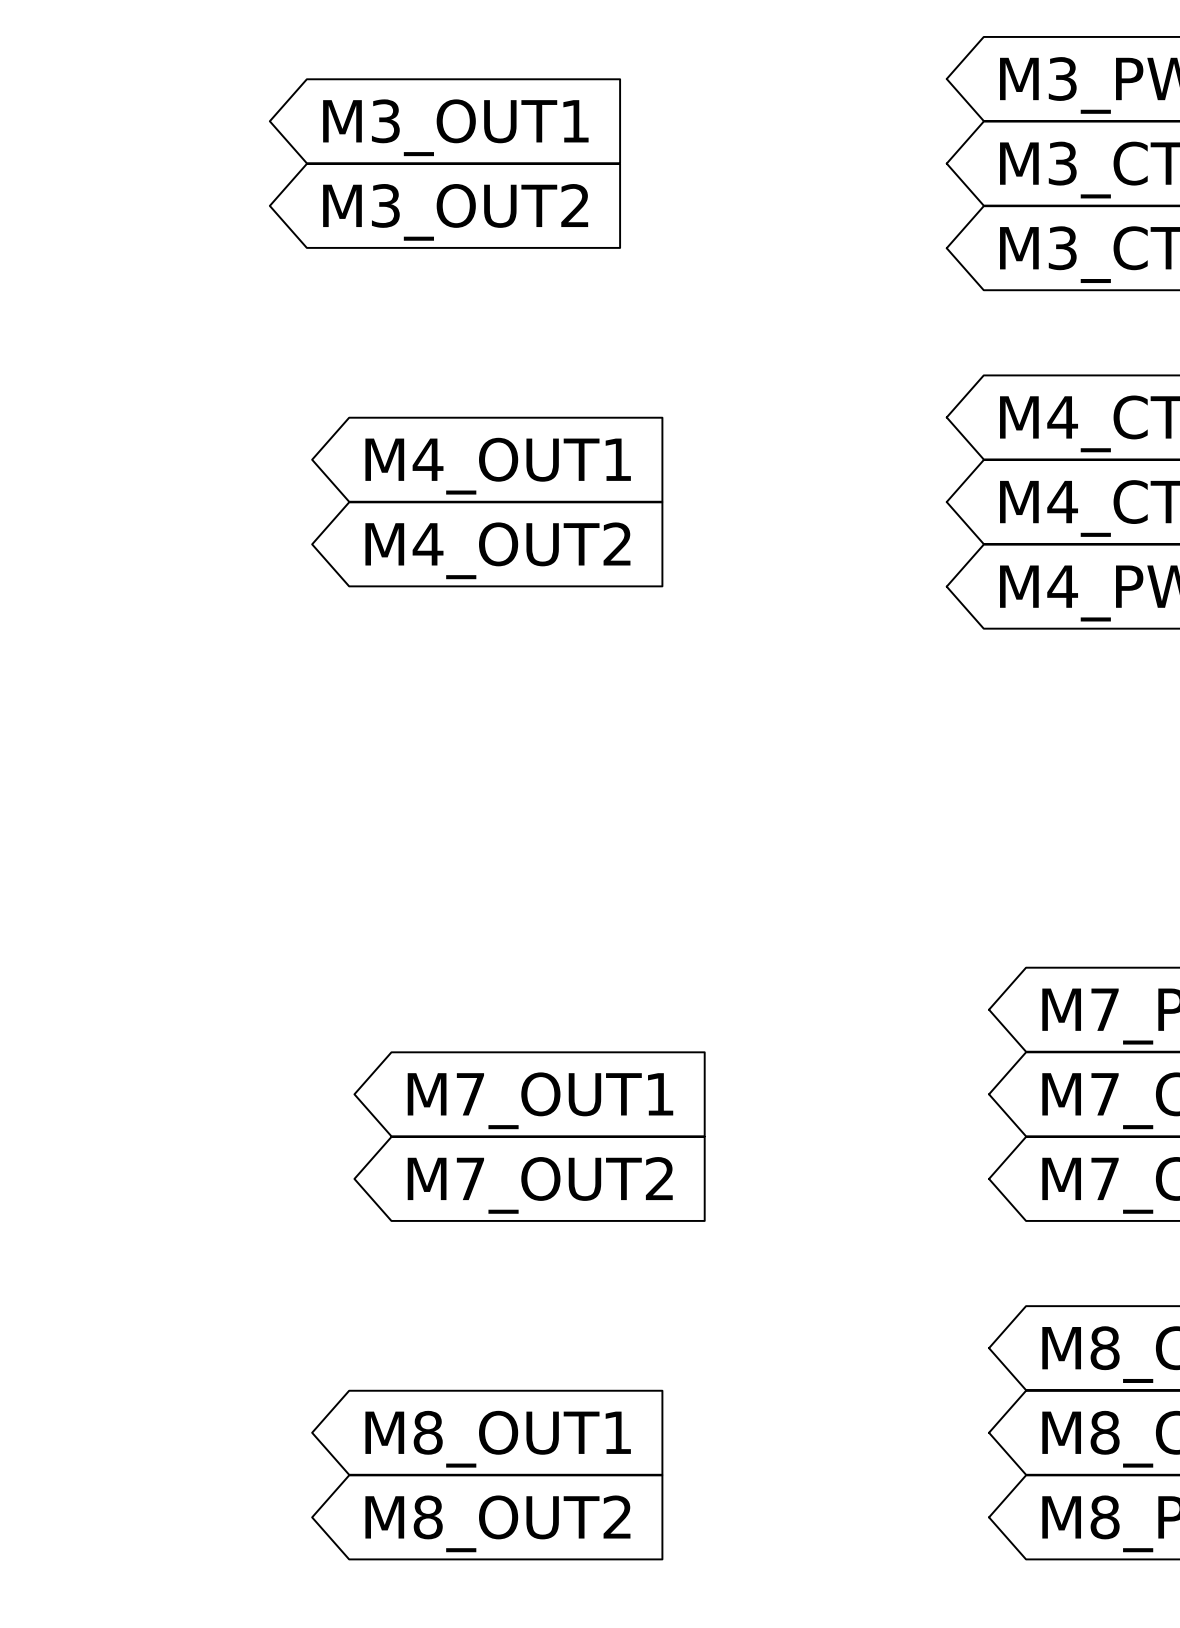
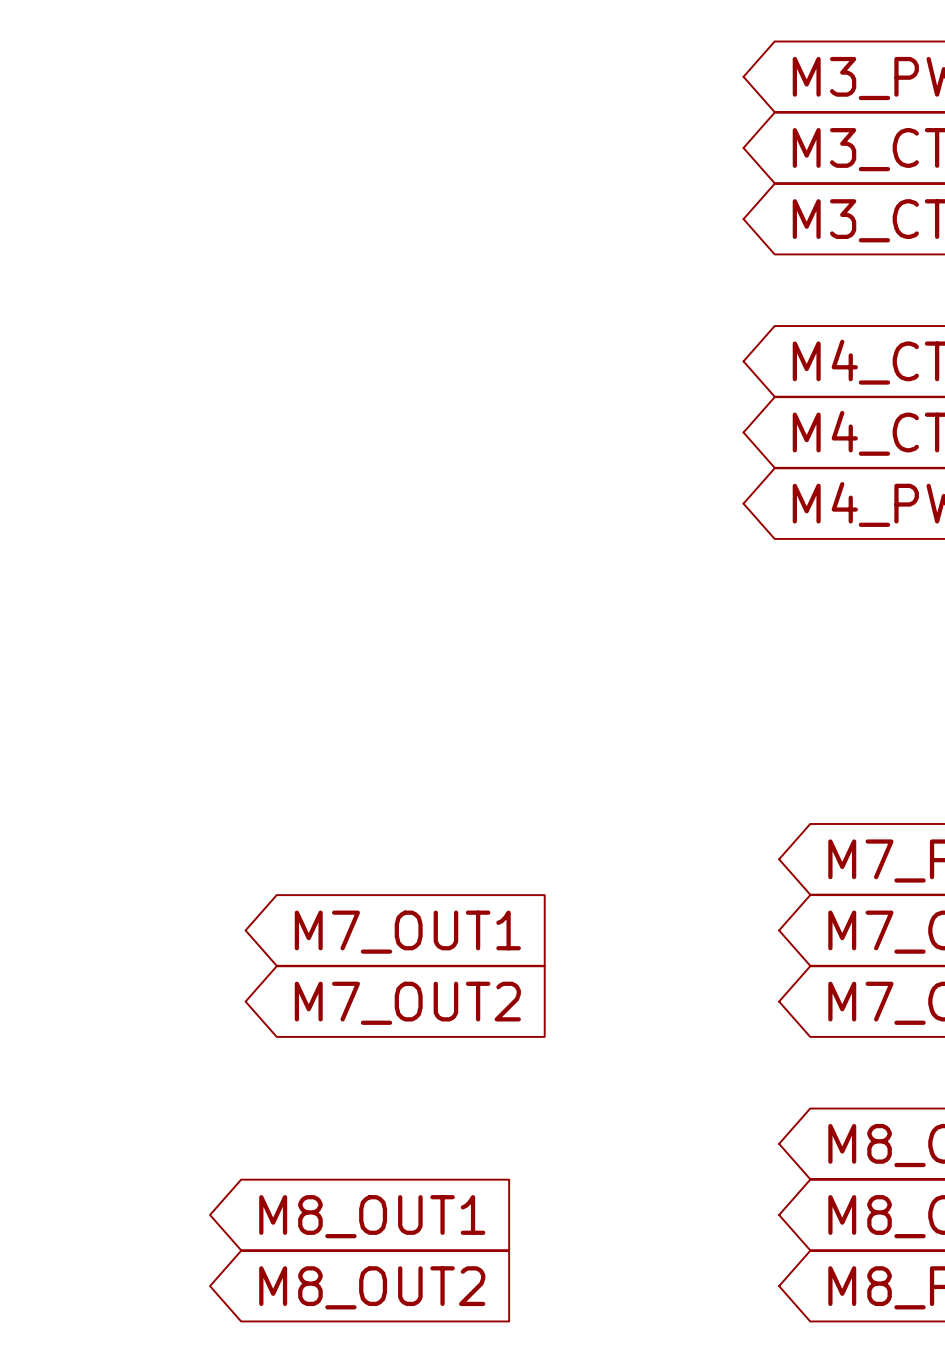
global label: M3_OUT1 (455, 127) -> none
global label: M3_OUT2 (455, 212) -> none
global label: M4_OUT1 (498, 466) -> none
global label: M4_OUT2 (497, 550) -> none

